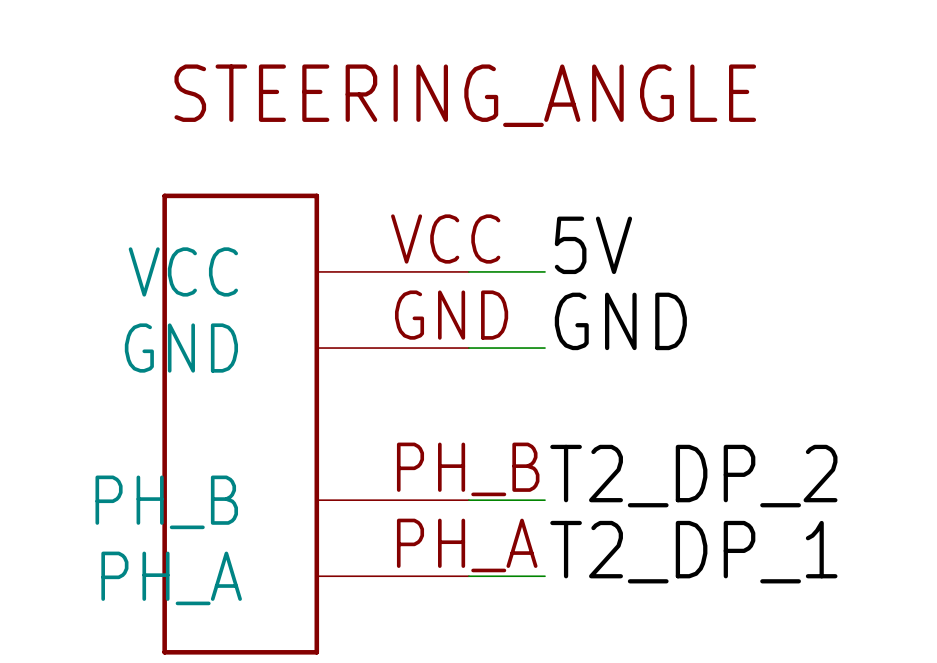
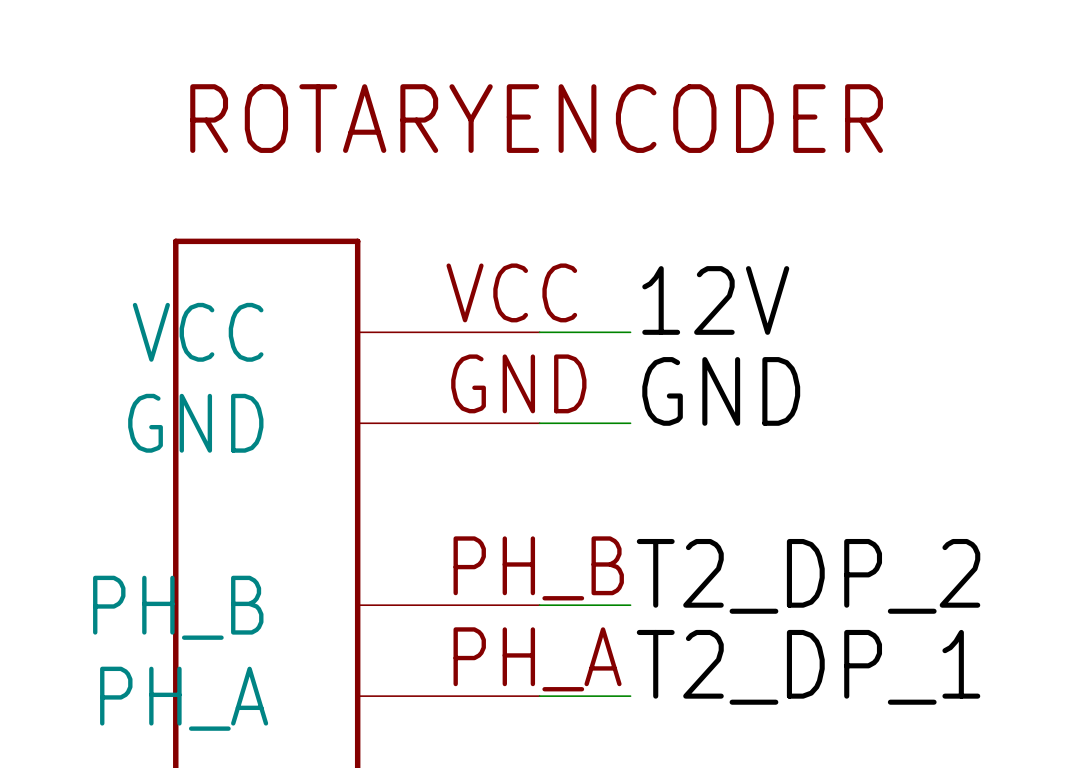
STEERING_ANGLE name: STEERING_ANGLE (465, 95) -> ROTARYENCODER (536, 118)
label: 5V (593, 245) -> 12V (715, 300)

